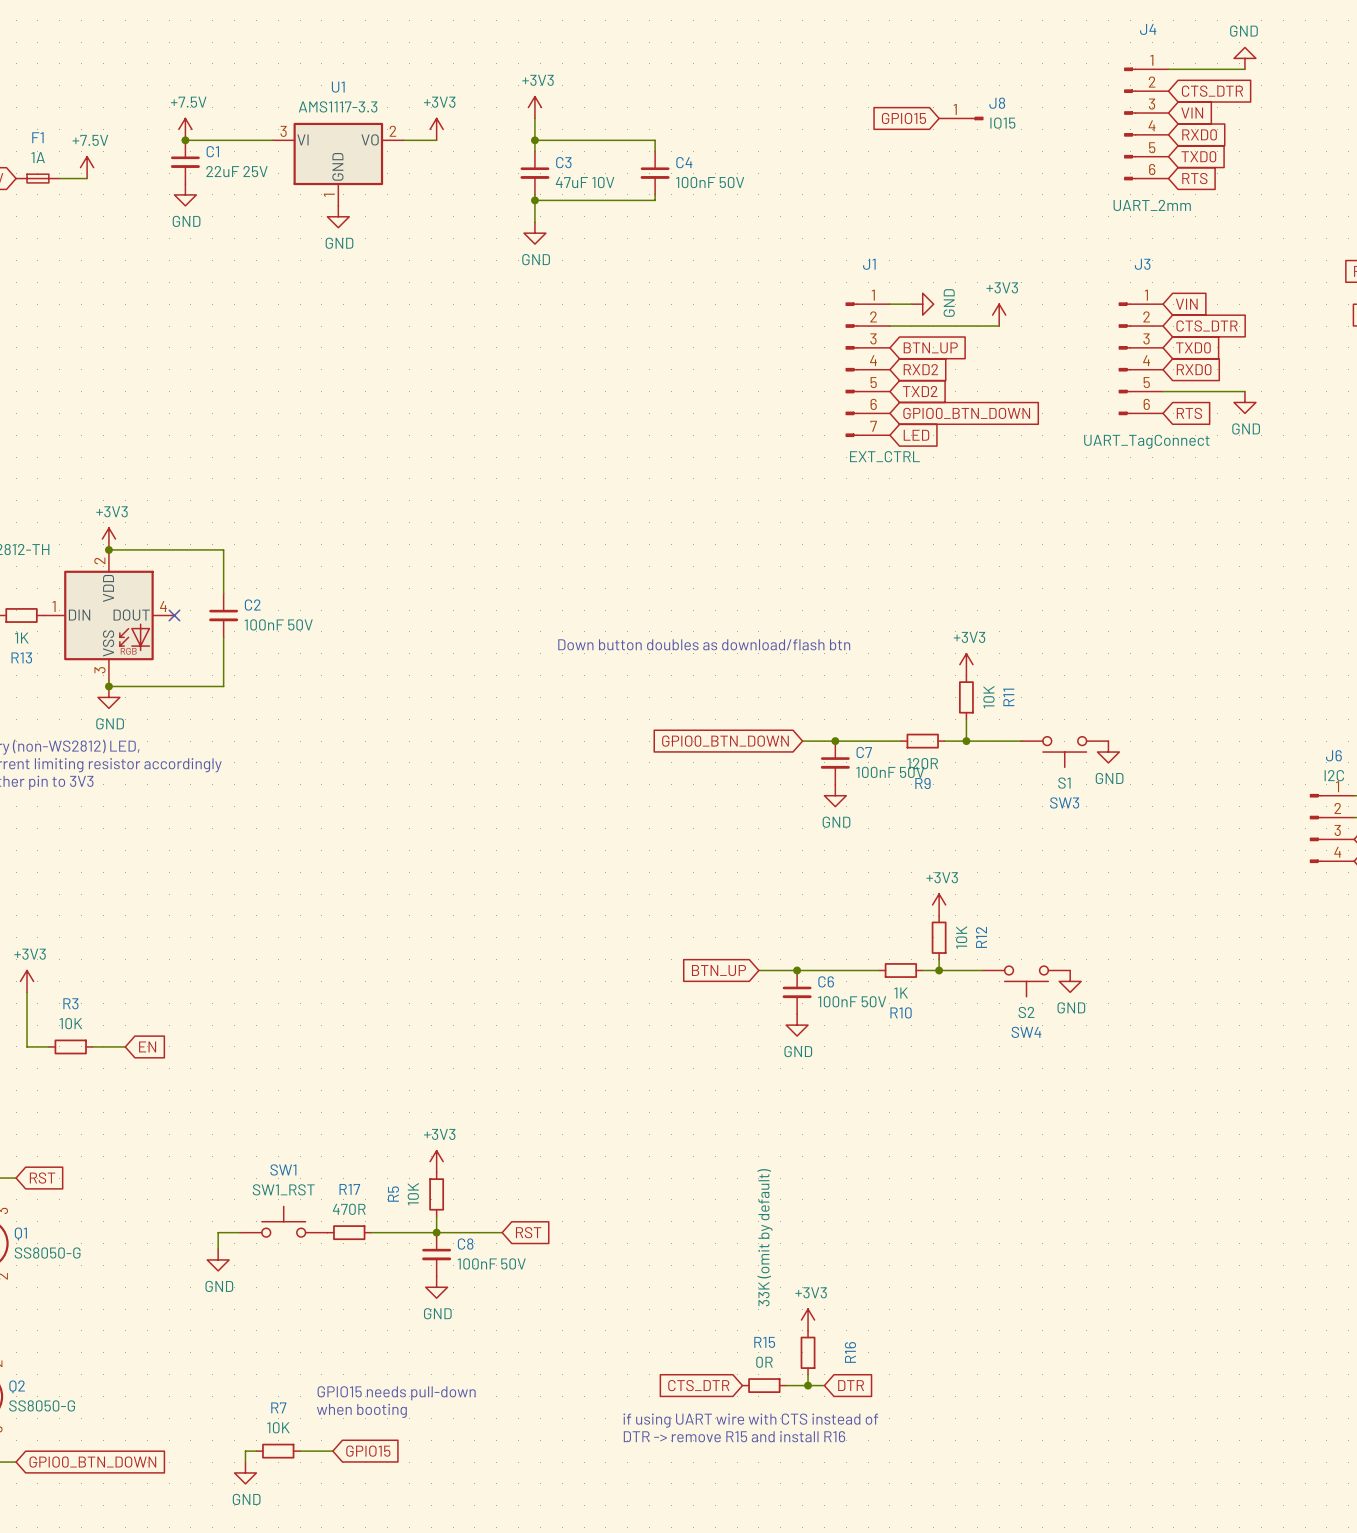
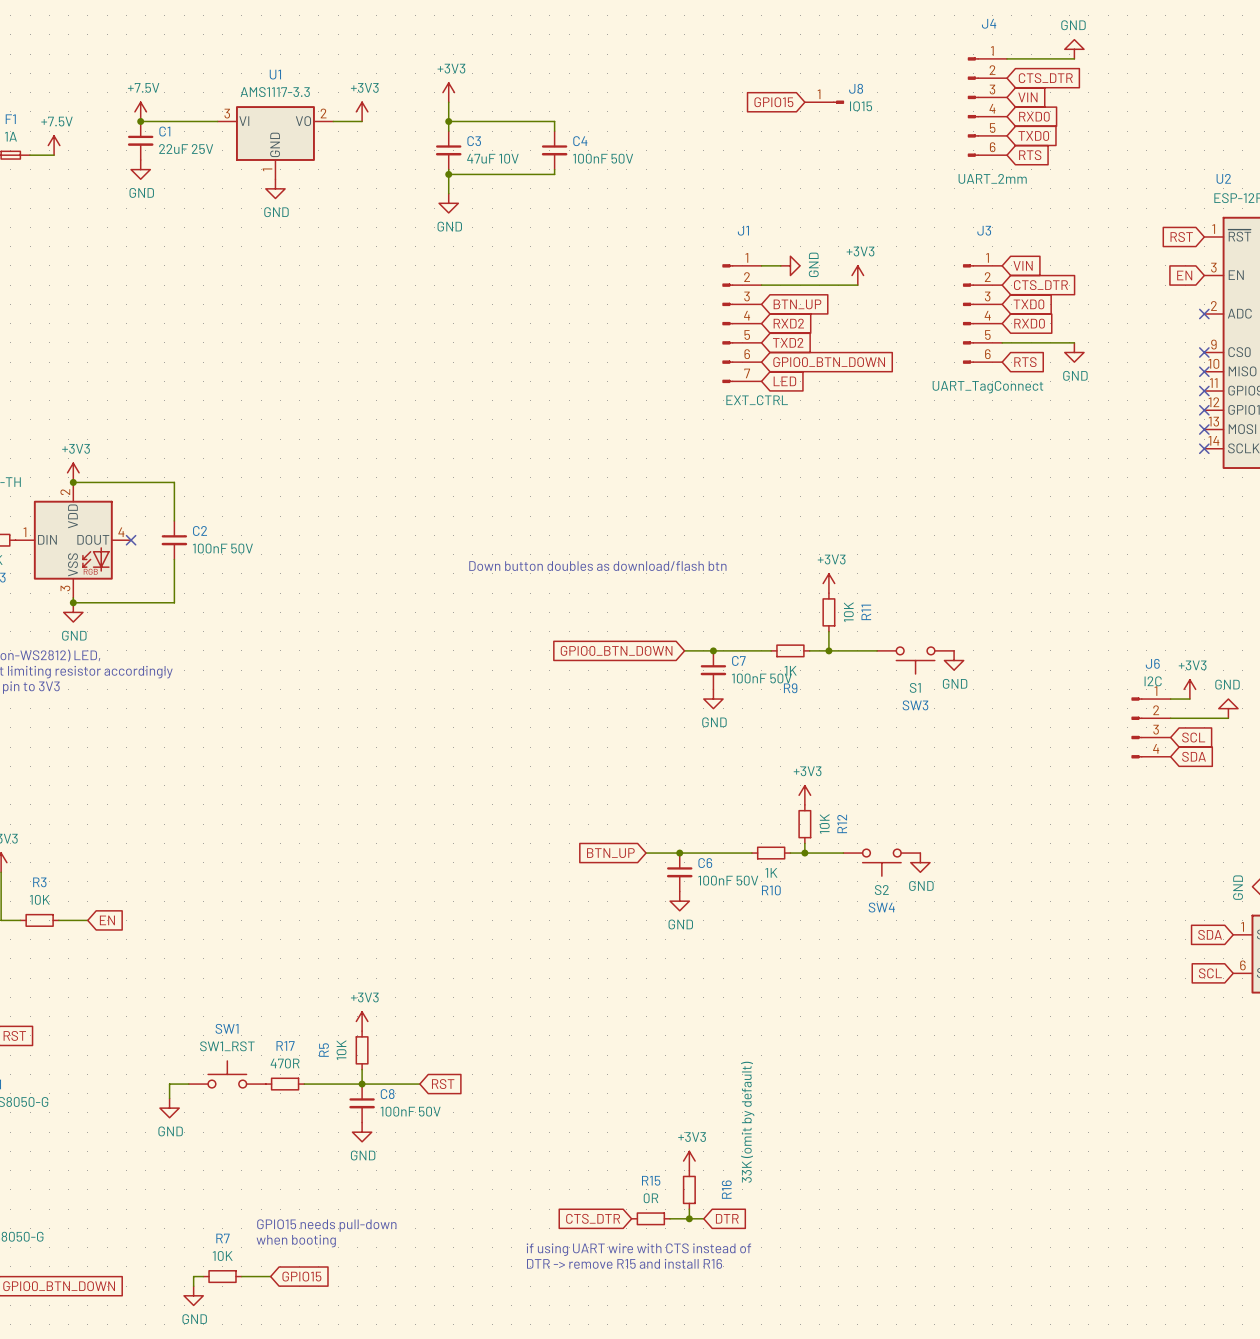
R9 value: 120R (922, 763) -> 1K (790, 670)
R16 value position: 33K (omit by default) (765, 1237) -> 33K (omit by default) (747, 1122)

